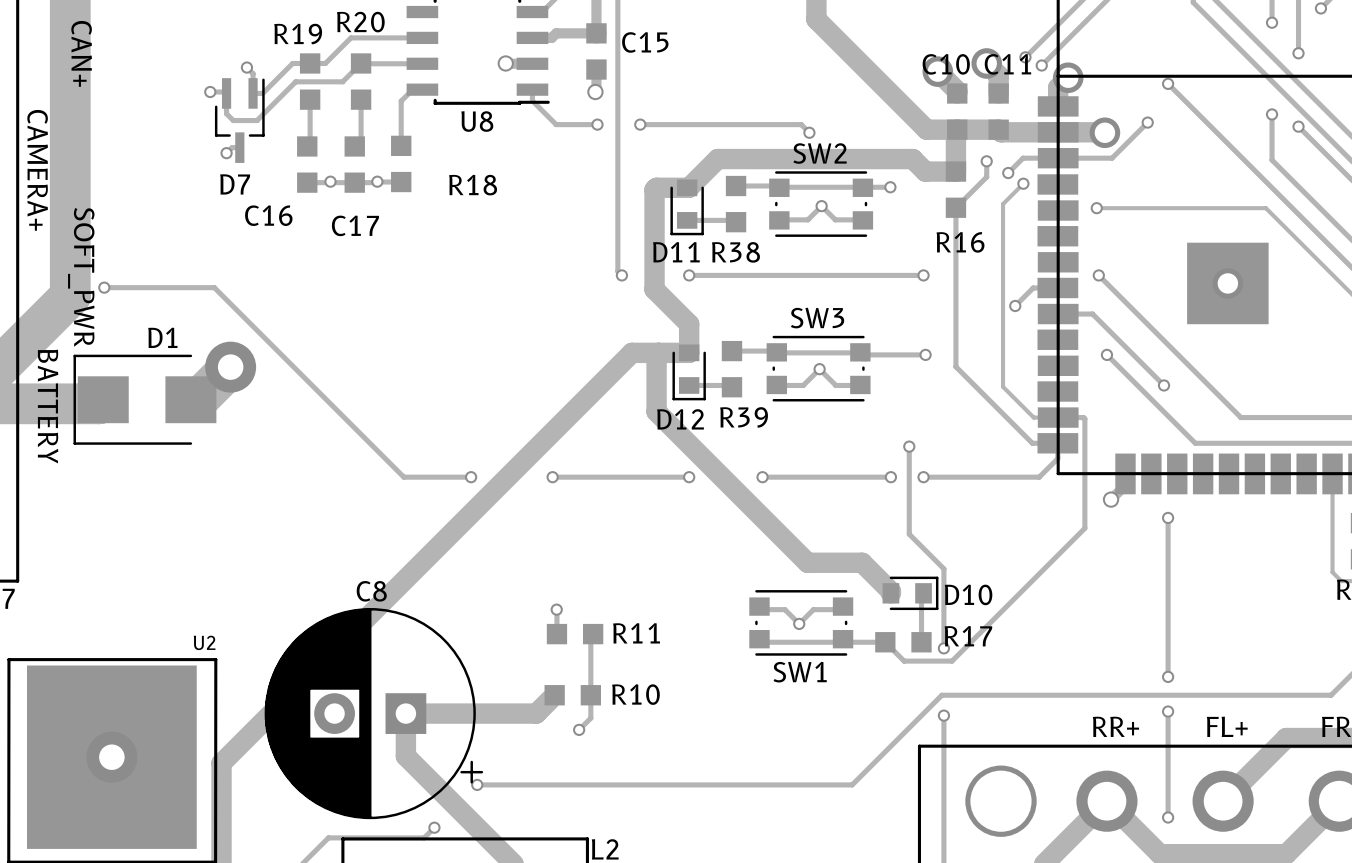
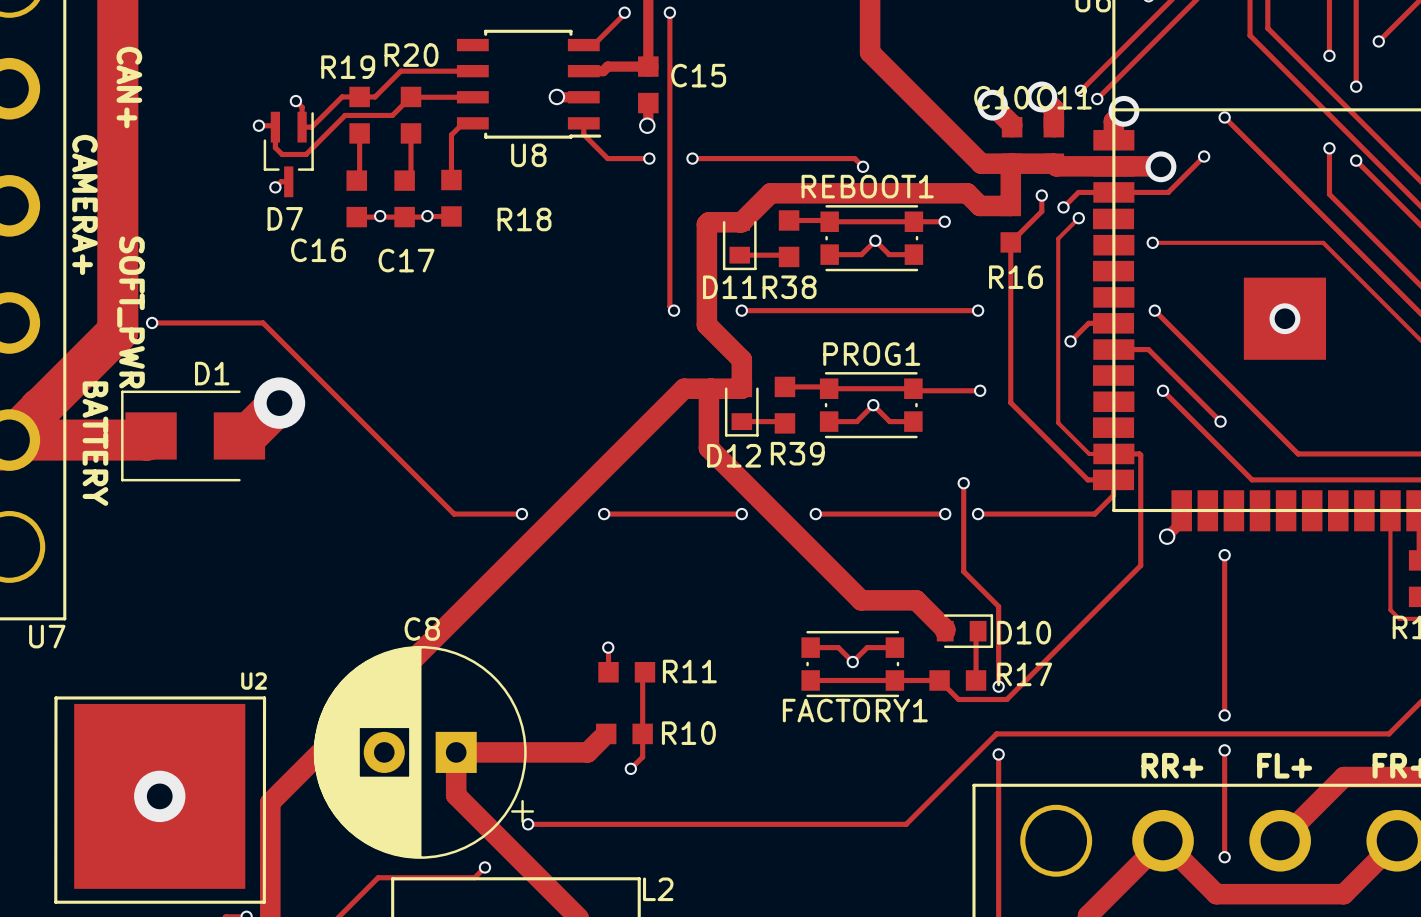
REBOOT1: none -> (871, 238)
SW2: (821, 204) -> none
SW3: (818, 368) -> none
PROG1: none -> (871, 405)
SW1: (801, 622) -> none
FACTORY1: none -> (852, 664)

